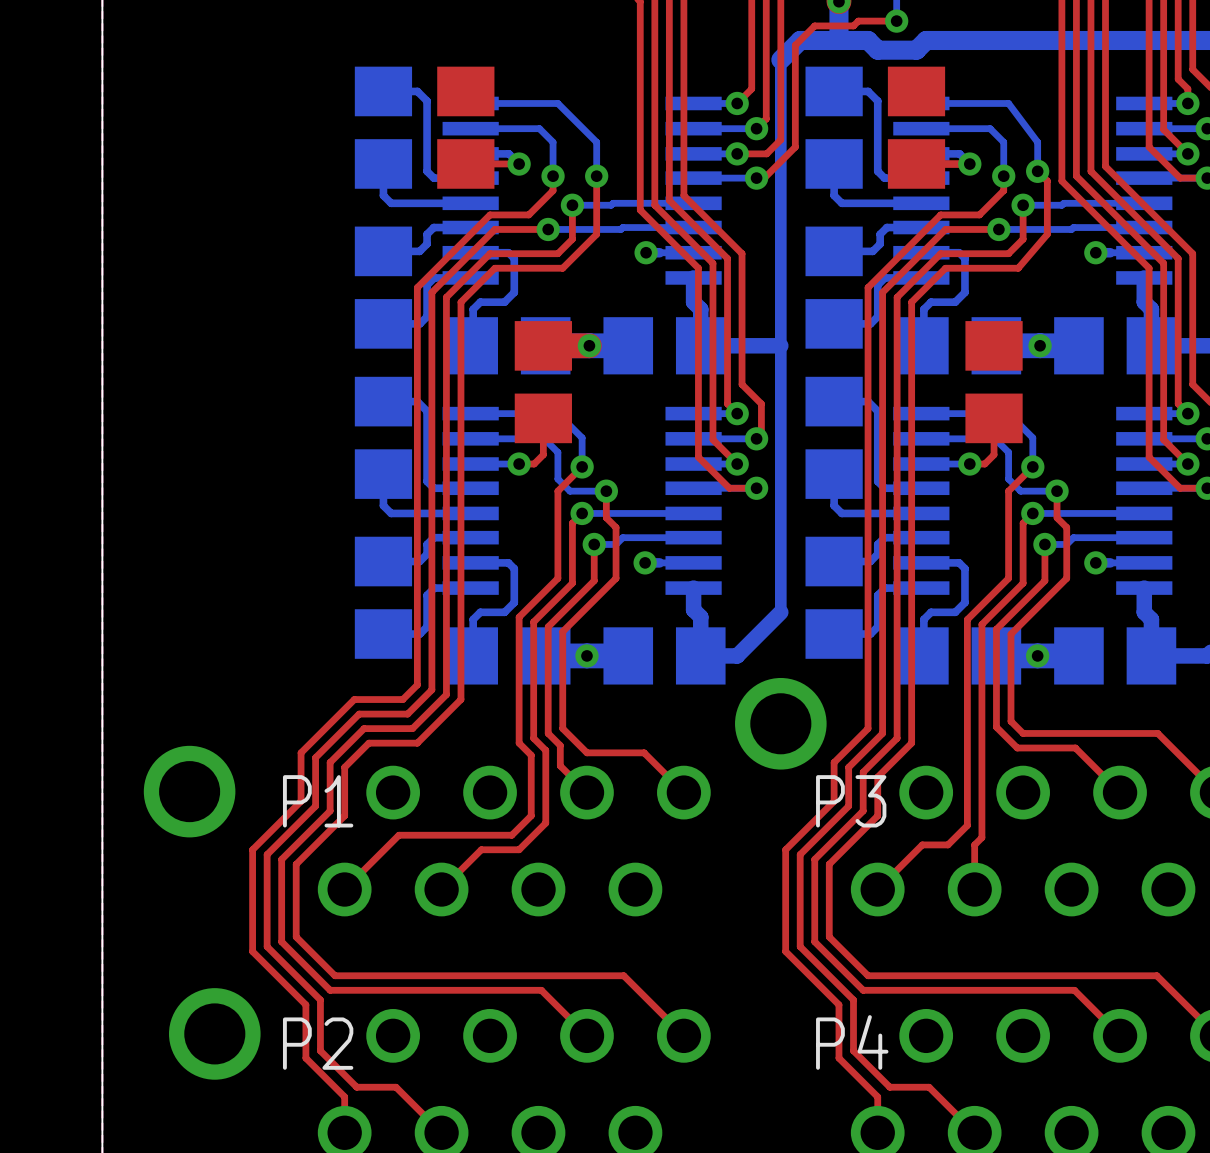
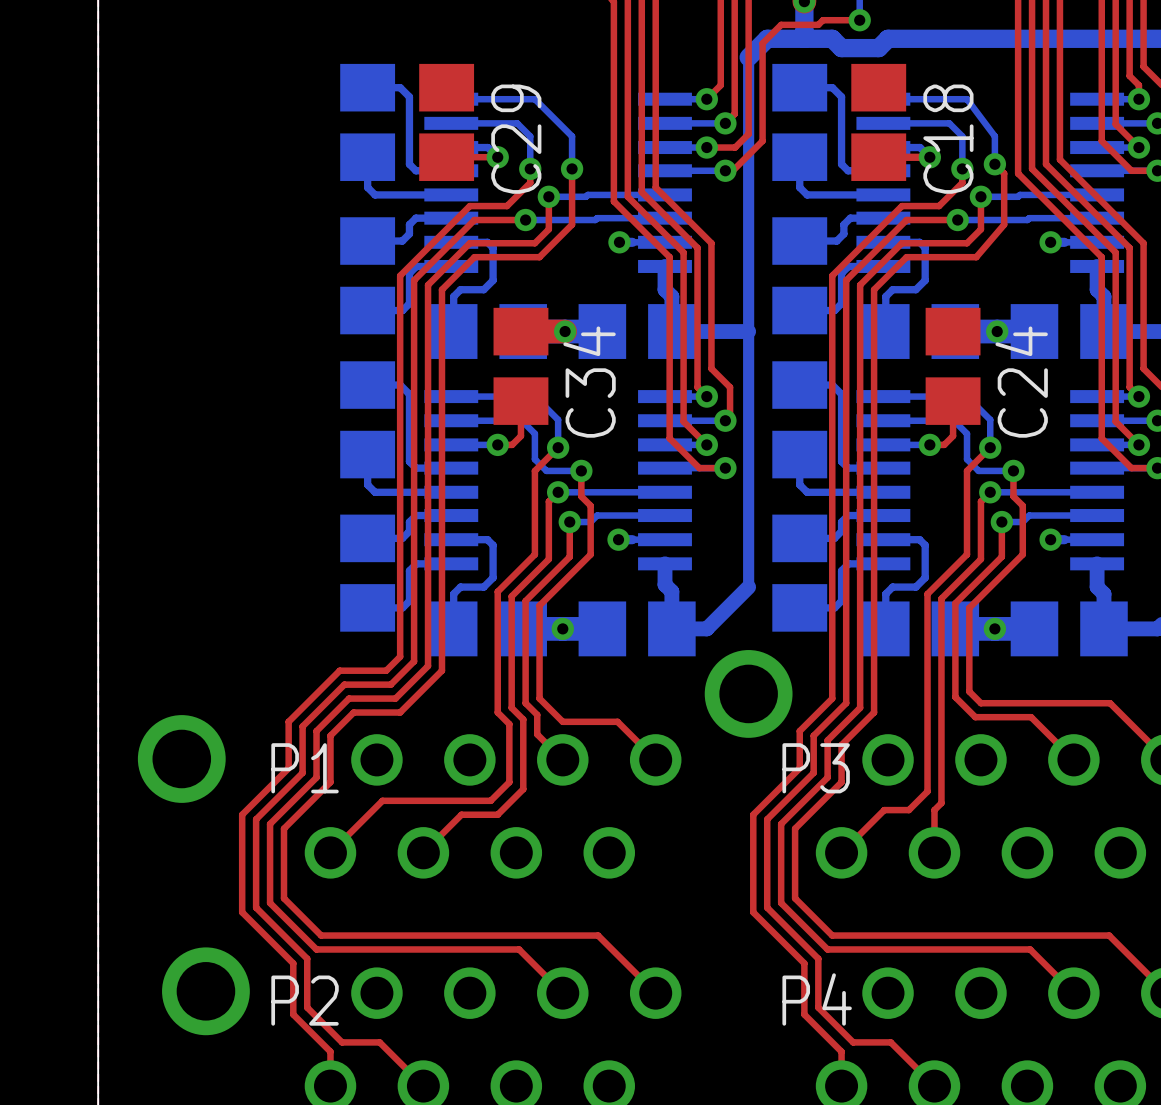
C29 name: none -> C29 (516, 139)
C18 name: none -> C18 (948, 139)
C34 name: none -> C34 (589, 382)
C24 name: none -> C24 (1021, 382)

